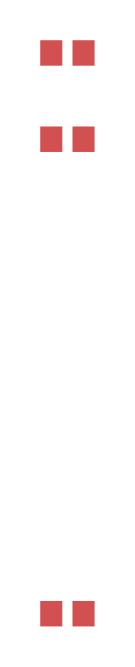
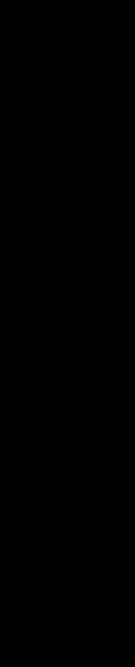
part: (67, 52) -> none
part: (67, 139) -> none
part: (67, 613) -> none

